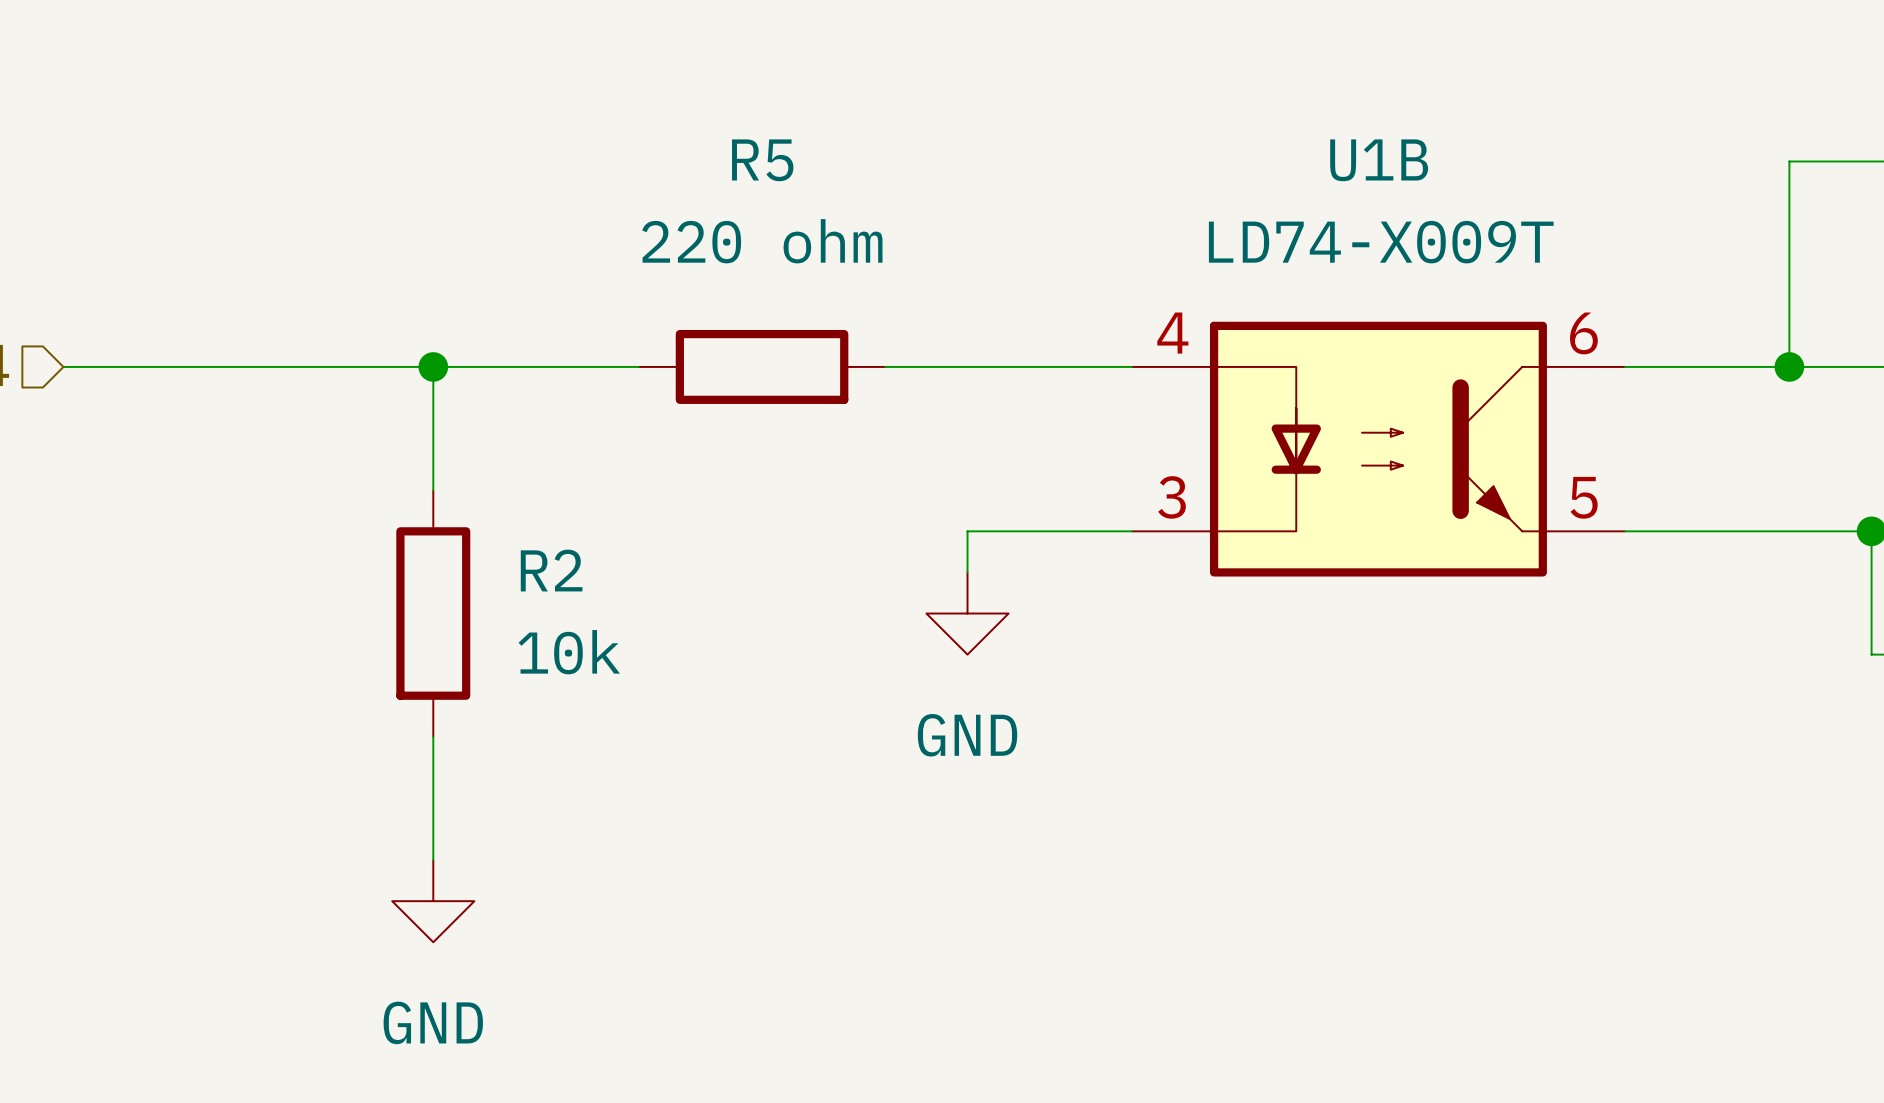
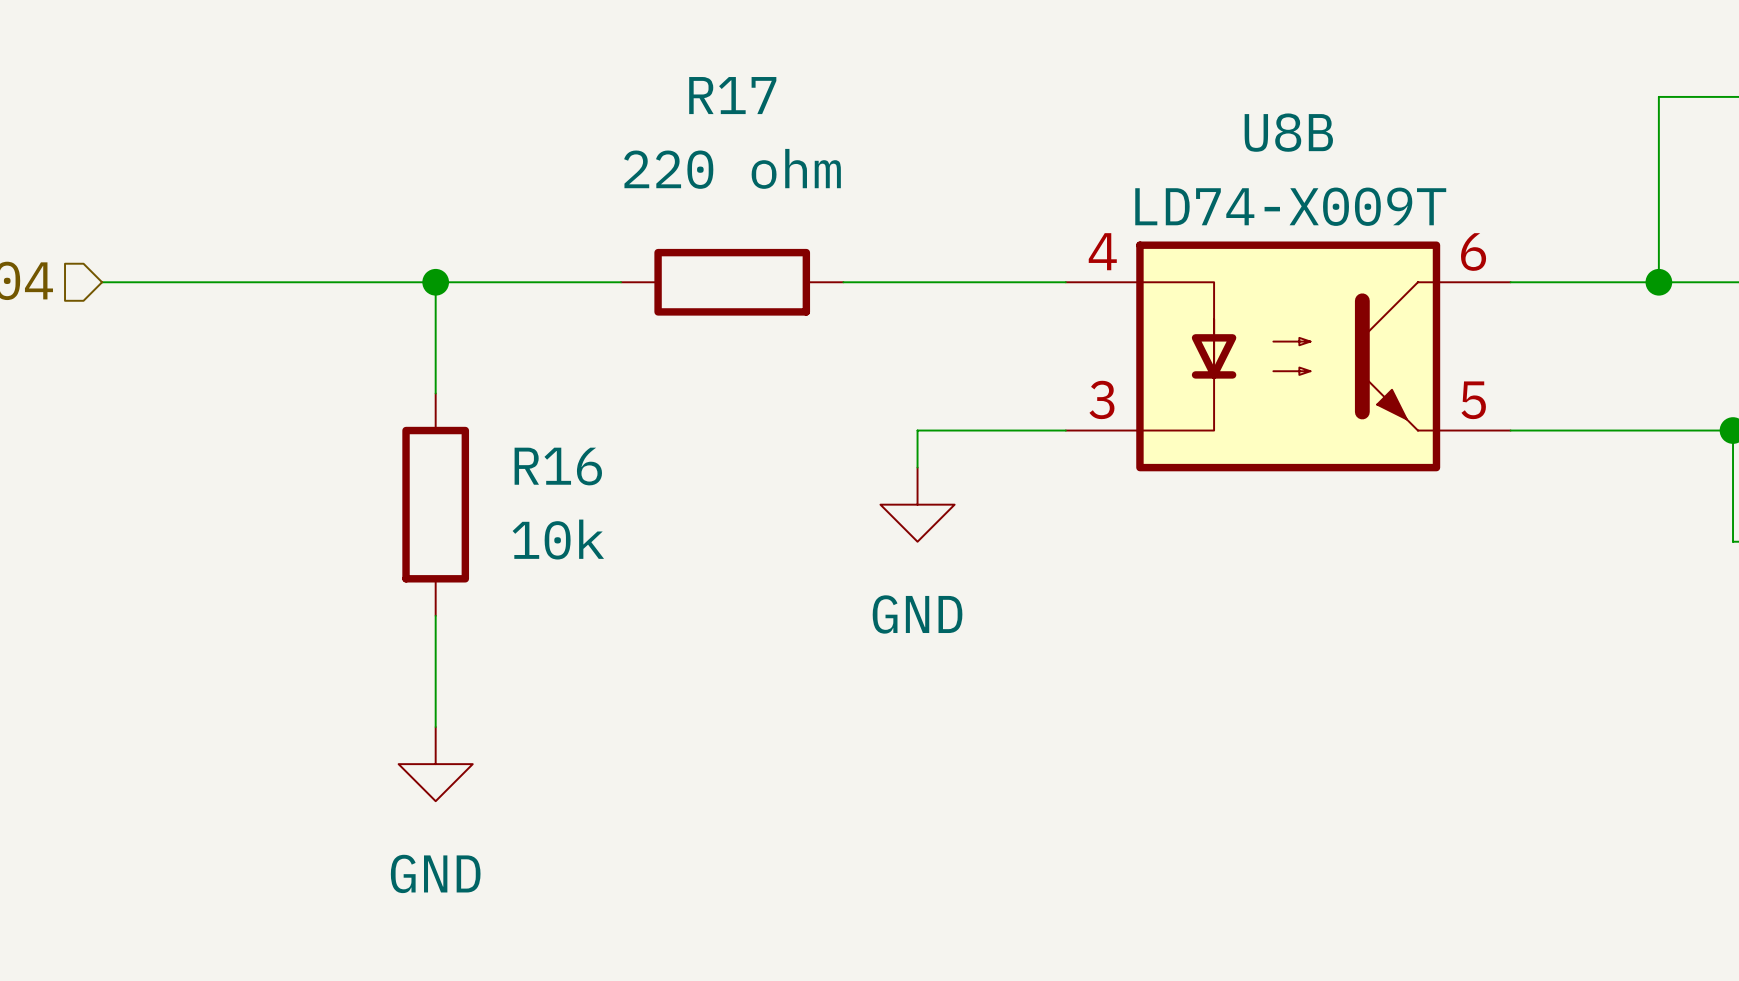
R5 name: R5 (762, 160) -> R17 (732, 95)
U1B name: U1B (1379, 160) -> U8B (1288, 132)
U1B value position: LD74-X009T (1381, 242) -> LD74-X009T (1290, 206)
R2 name: R2 (551, 570) -> R16 (558, 466)

